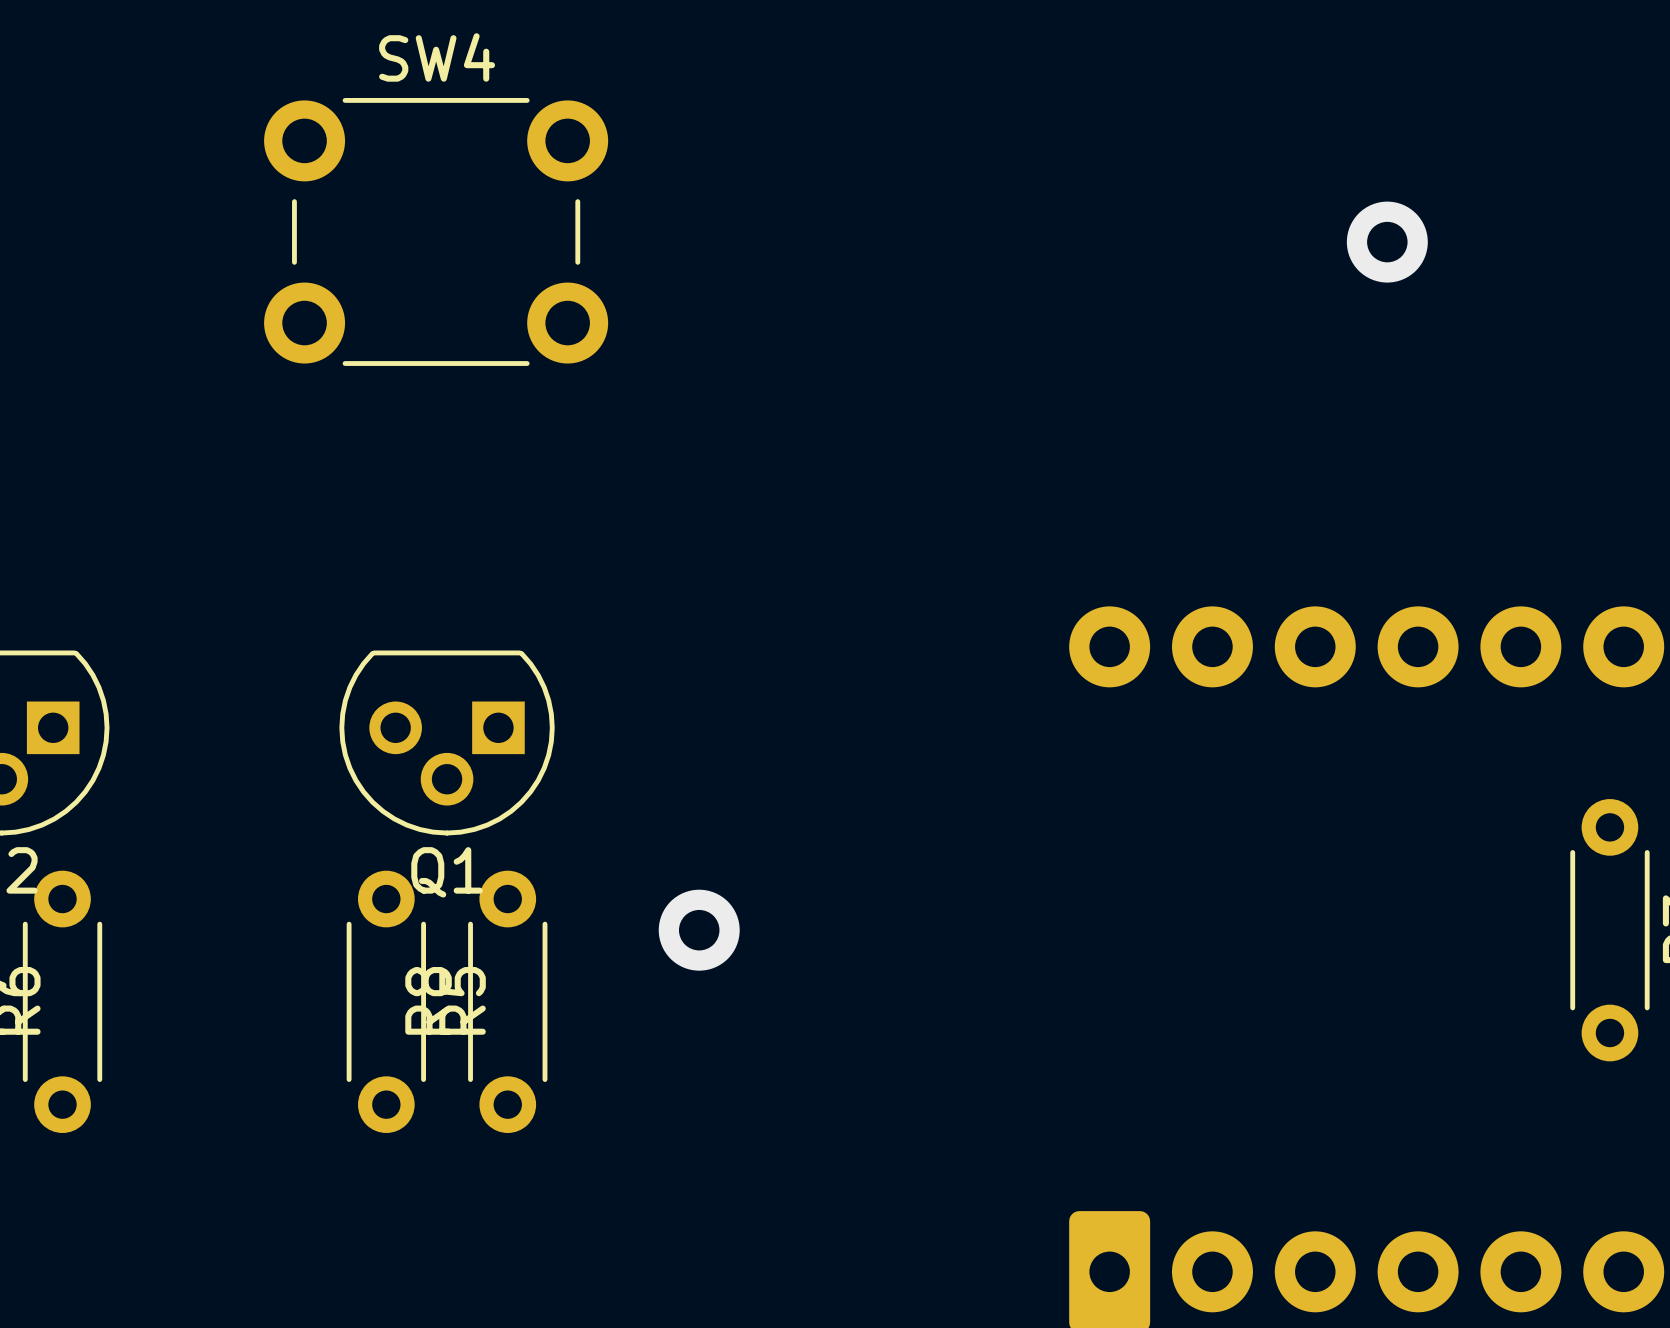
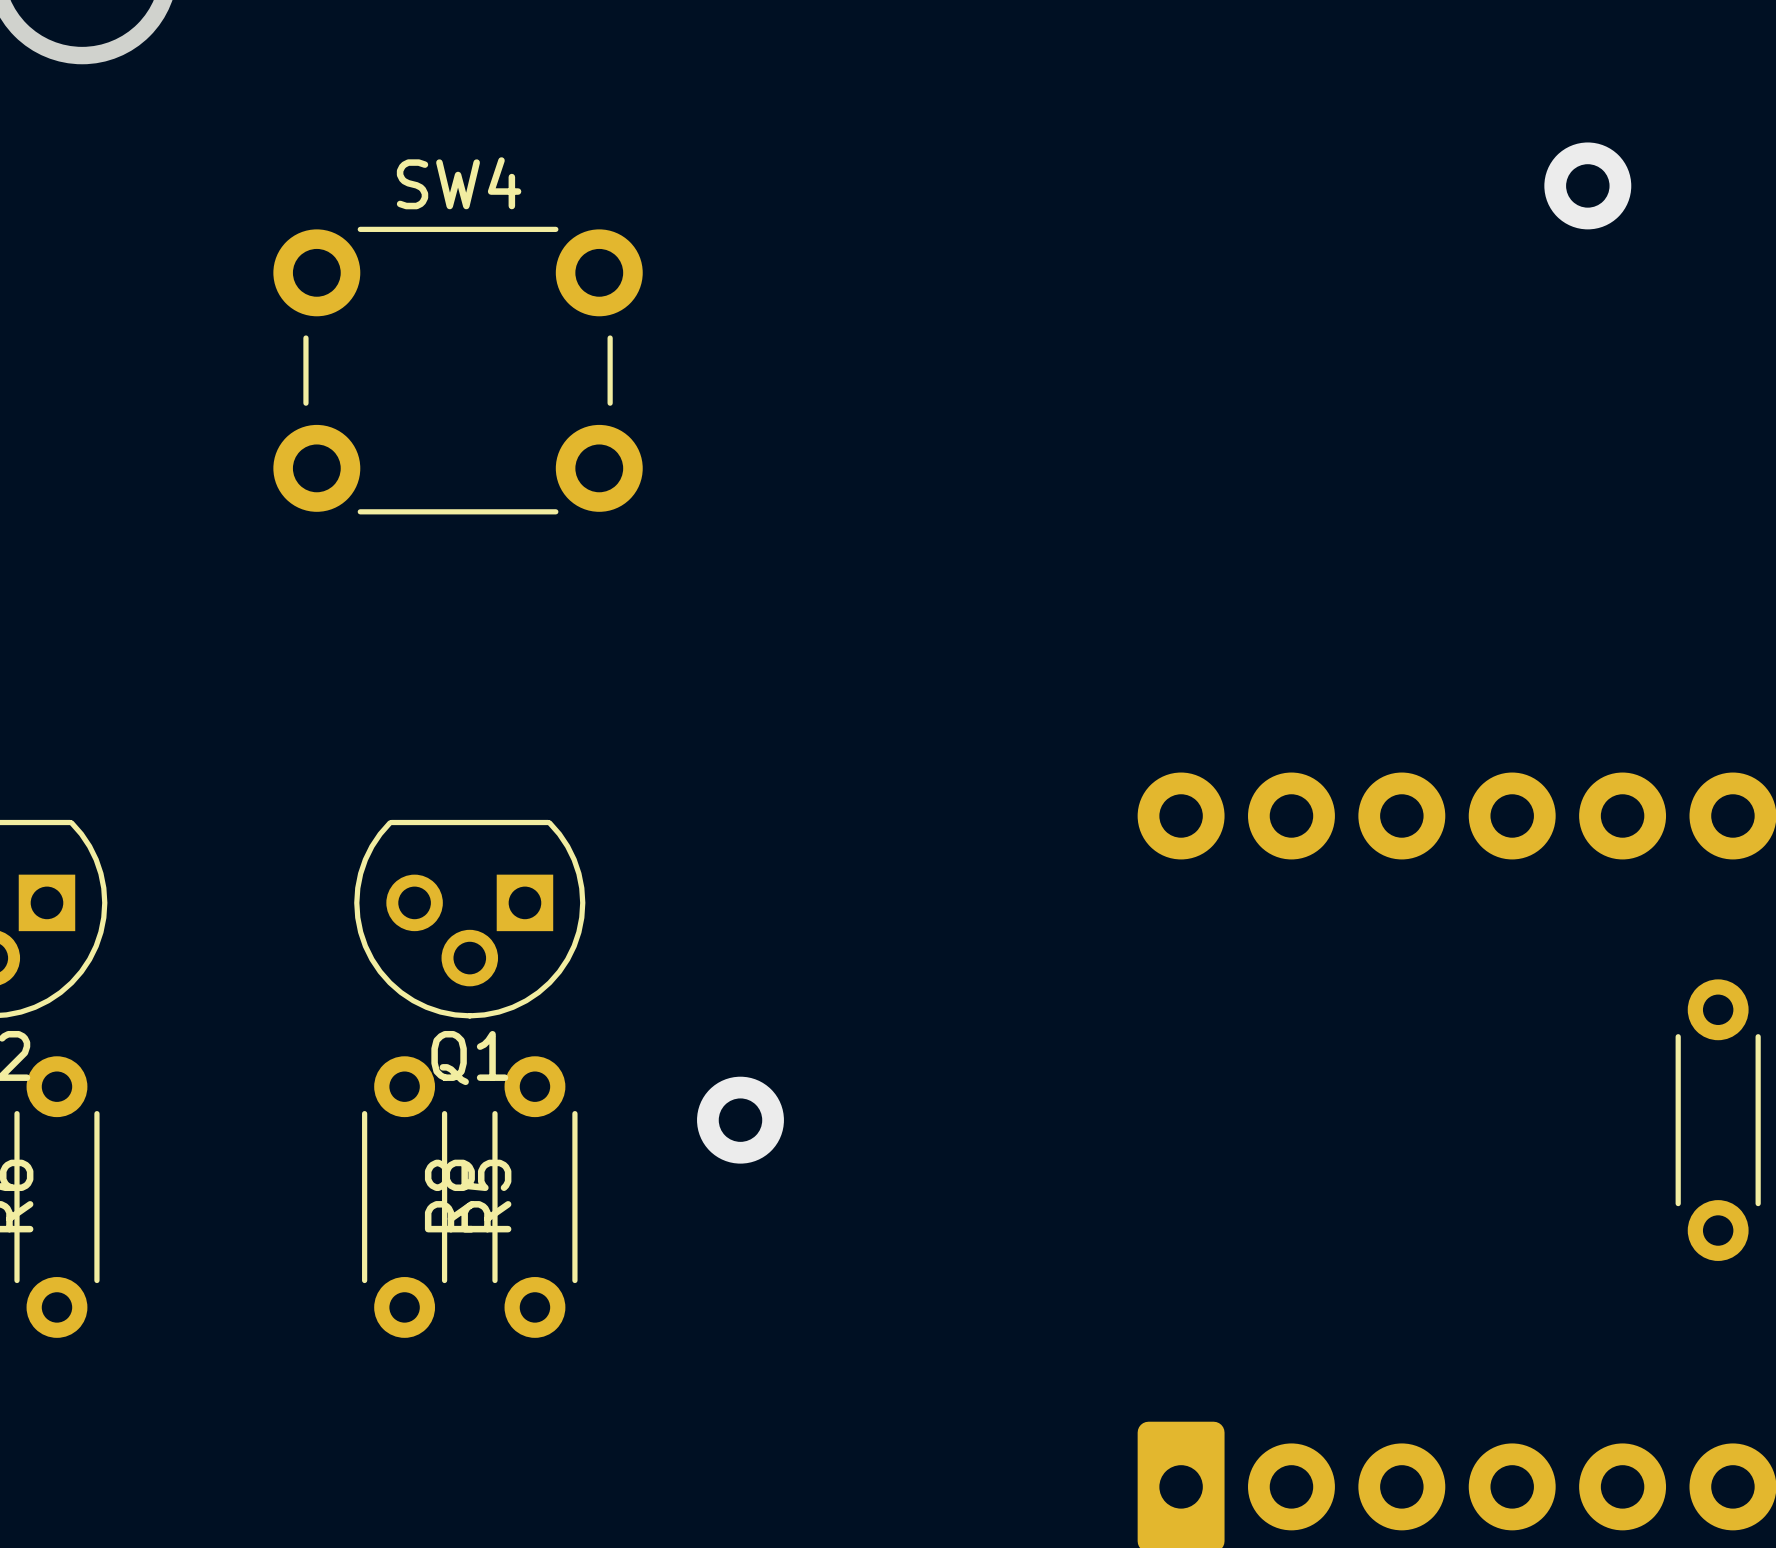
via position: (1387, 242) -> (1587, 185)

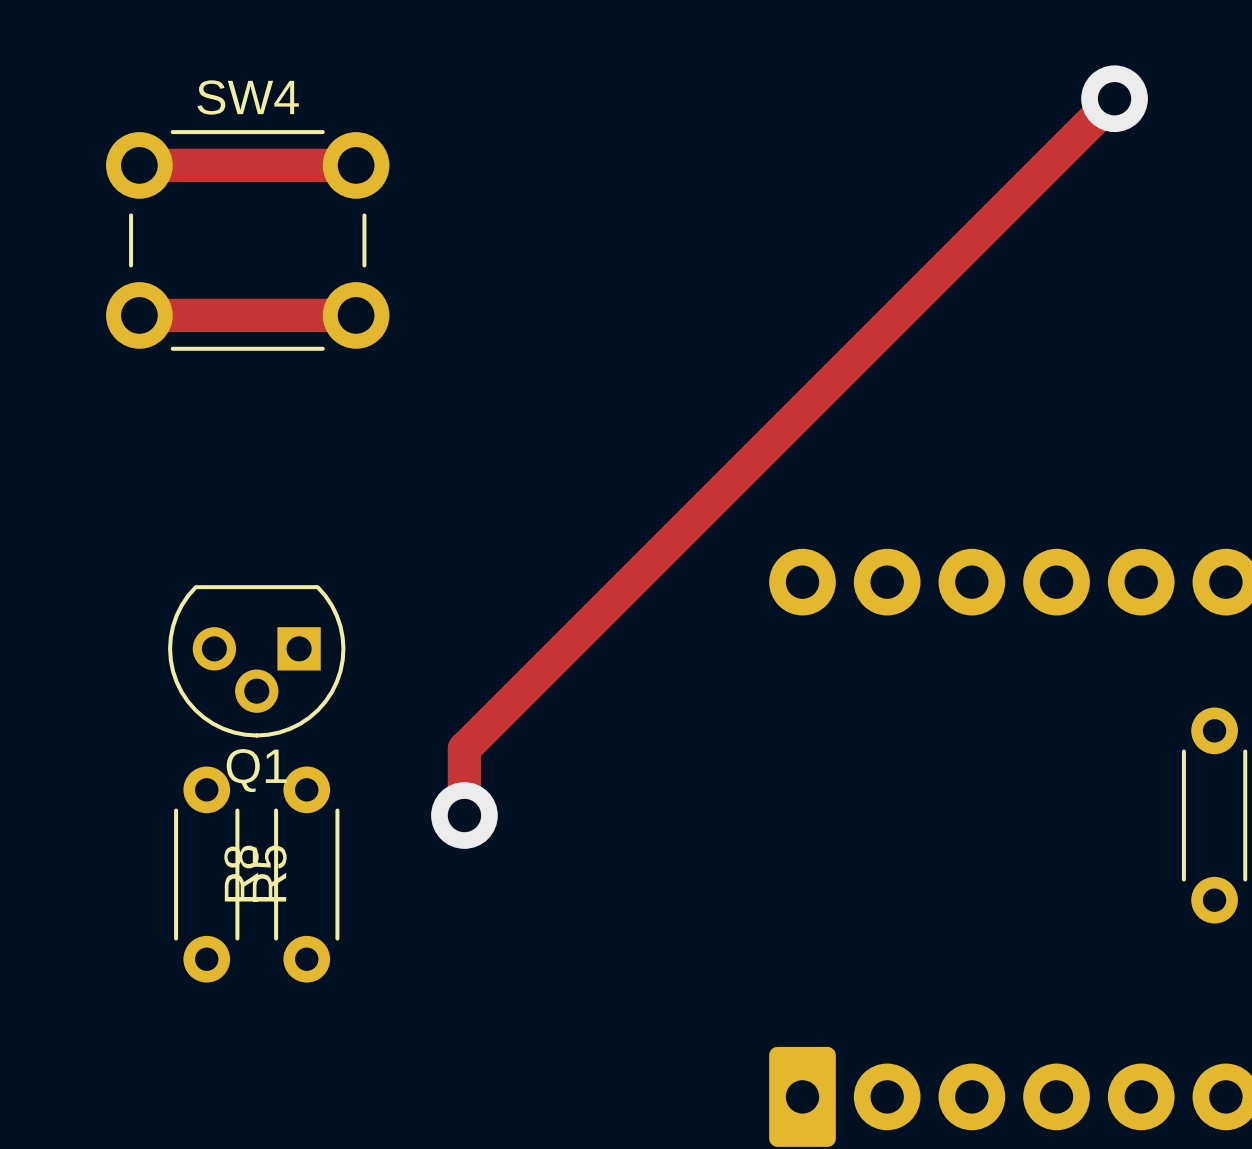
track: none -> (1114, 98) (464, 748) (464, 815)
track: none -> (139, 165) (356, 165)
track: none -> (139, 315) (356, 315)

